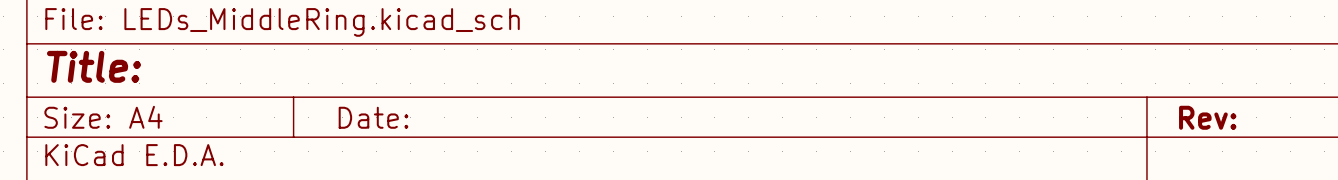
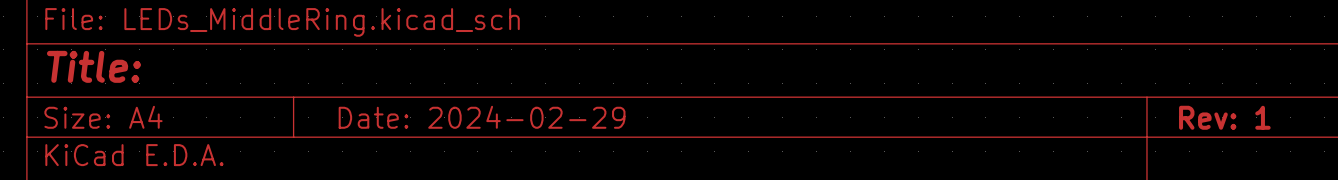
title block: Date: (373, 117) -> Date: 2024-02-29 (482, 117)
title block: Rev: (1207, 117) -> Rev: 1 (1224, 117)

